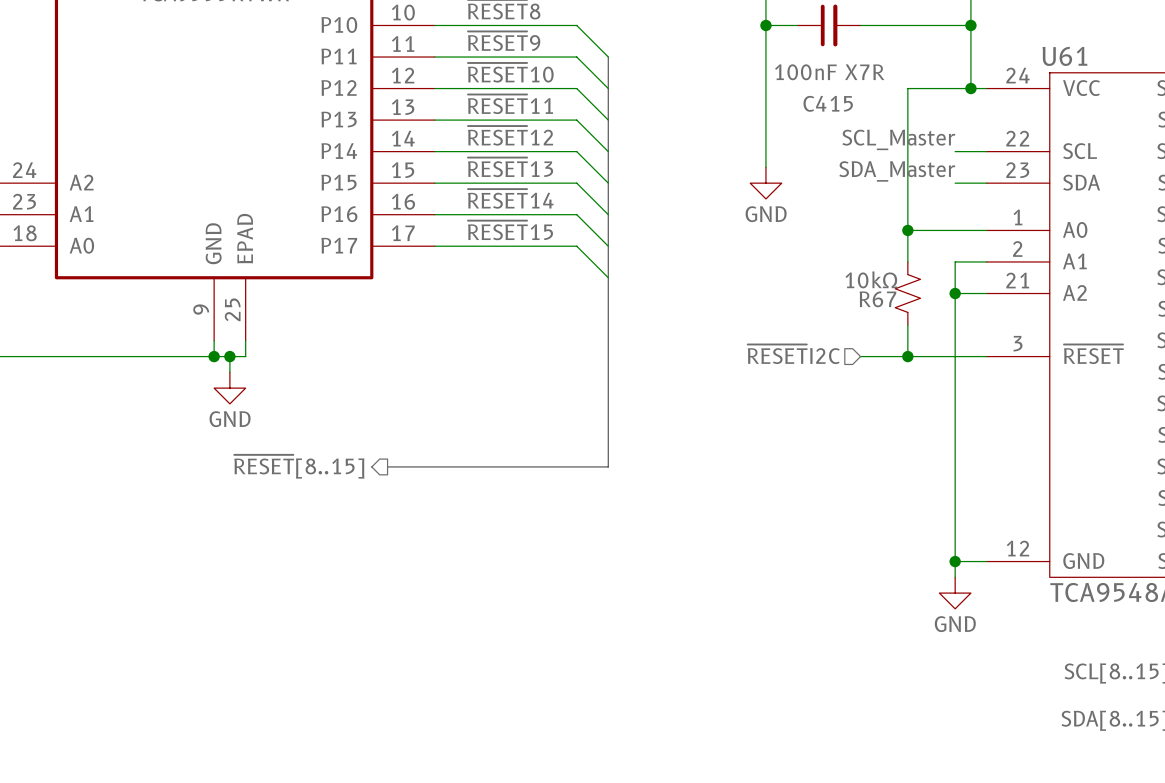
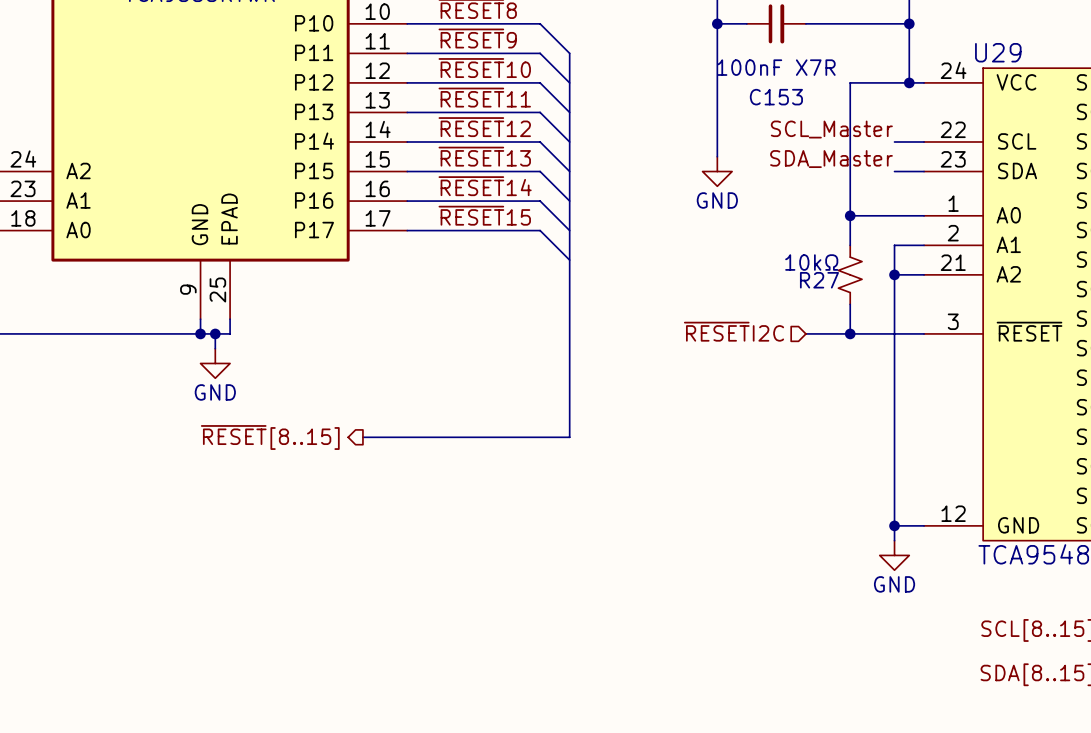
U61 name: U61 (1064, 56) -> U29 (998, 52)
C415 name: C415 (828, 103) -> C153 (776, 97)
R67 name: R67 (877, 299) -> R27 (819, 280)

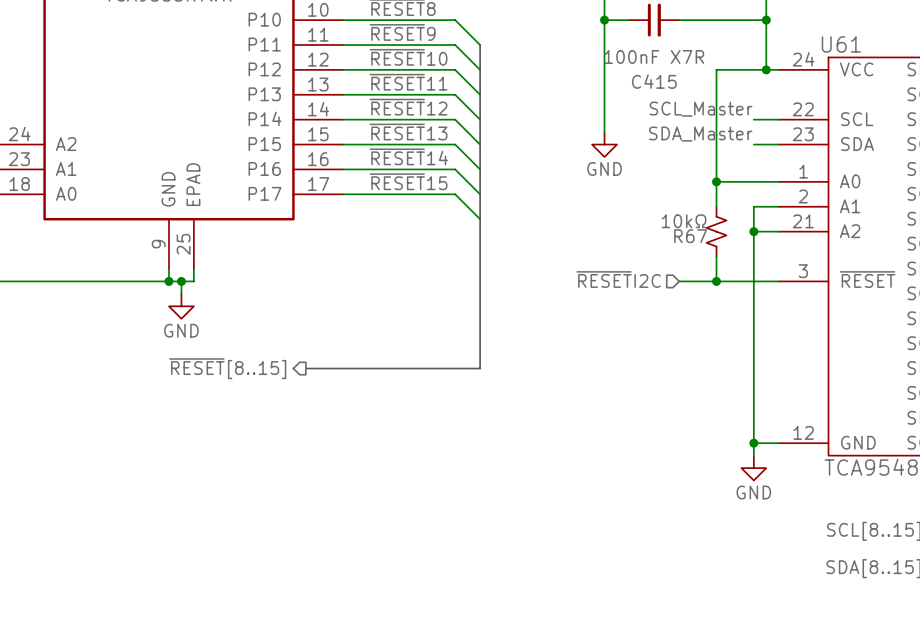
U29 name: U29 (998, 52) -> U61 (841, 44)
C153 name: C153 (776, 97) -> C415 (654, 81)
R27 name: R27 (819, 280) -> R67 (690, 236)

